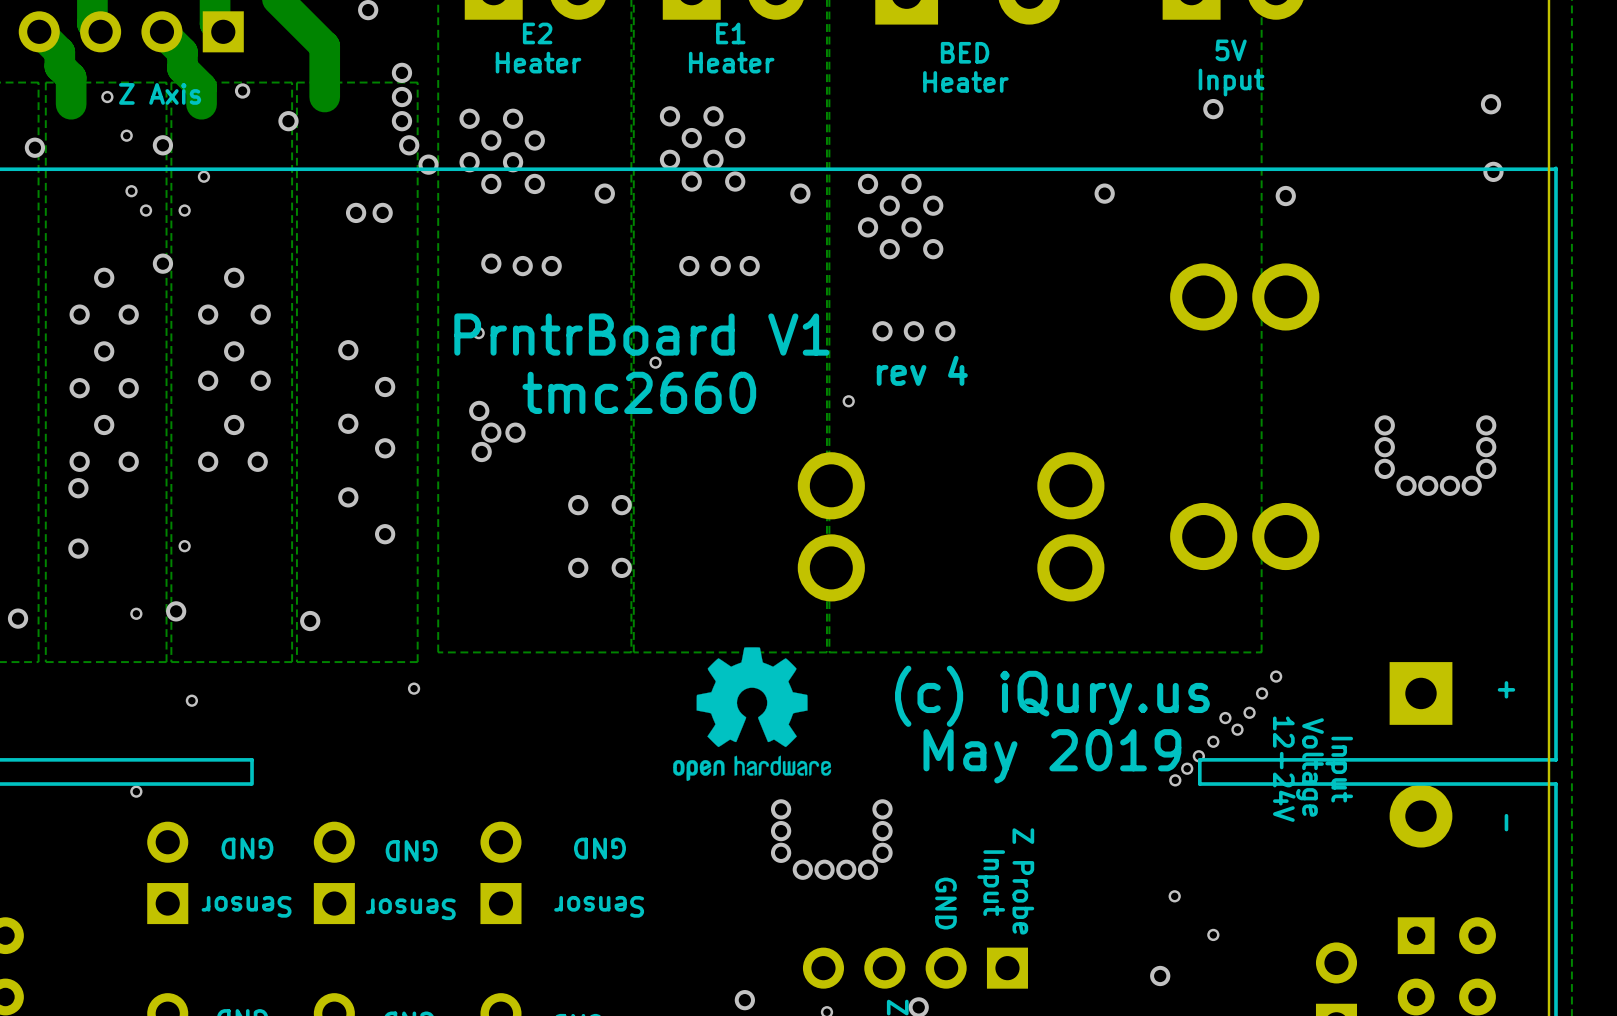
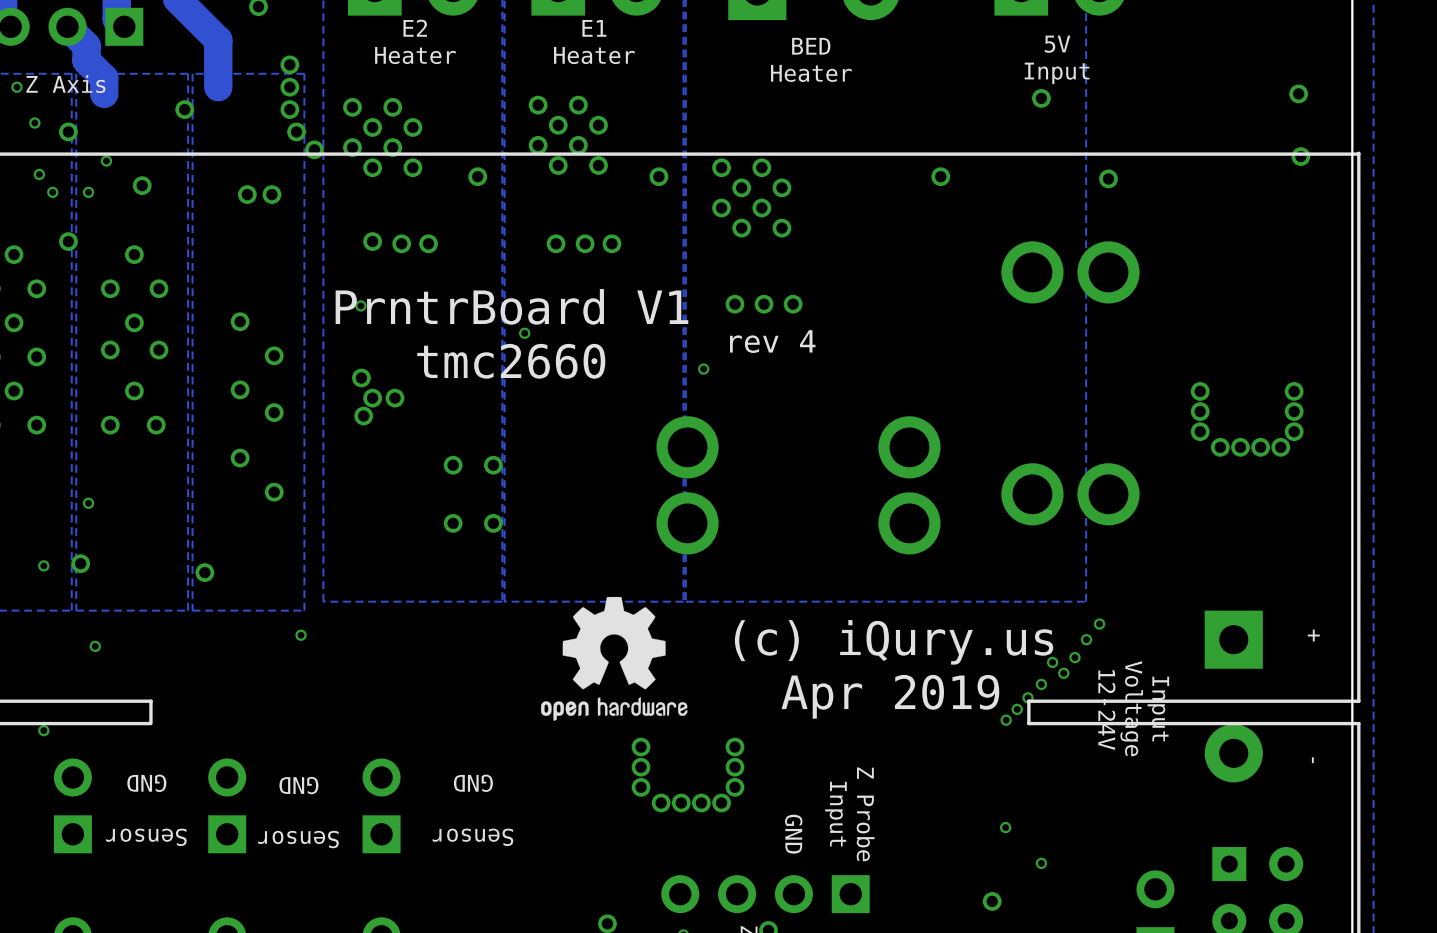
via: (242, 90) -> none
via: none -> (142, 185)
text: May 2019 (1052, 756) -> Apr 2019 (890, 696)

